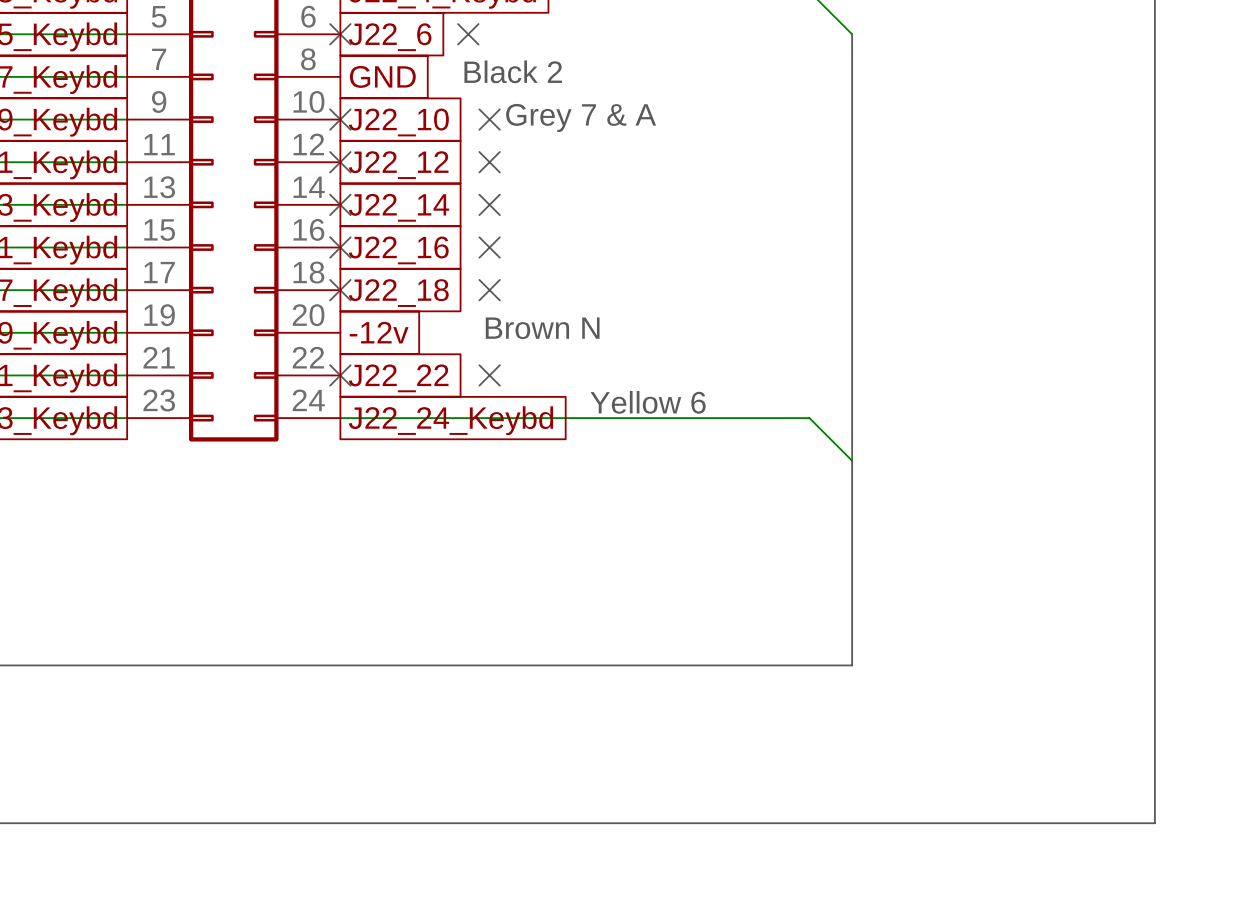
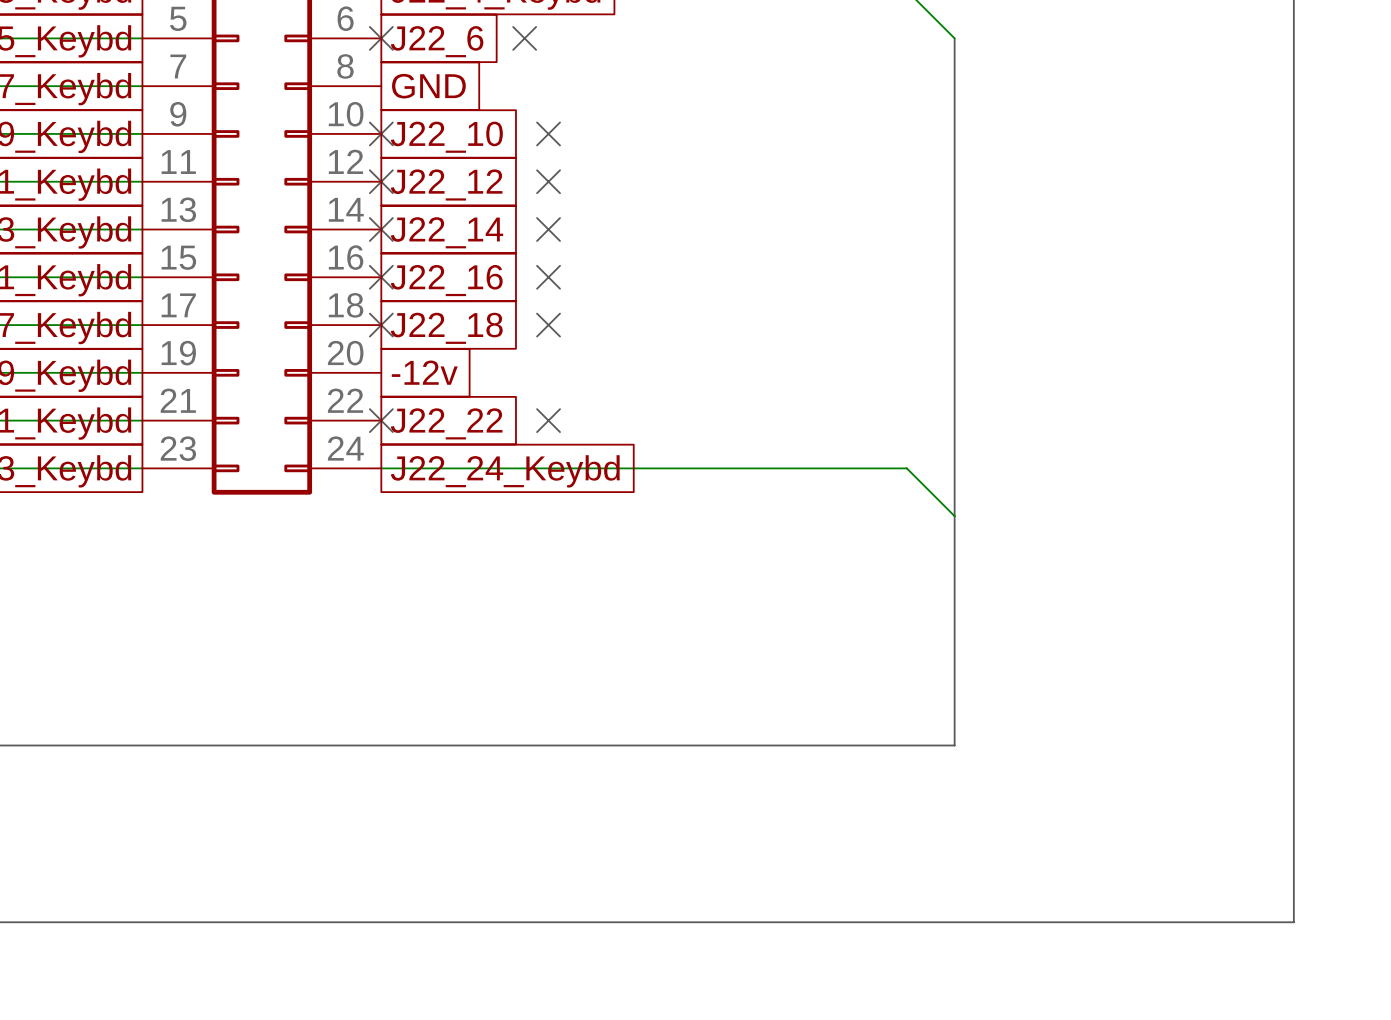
text: Black 2 (513, 71) -> none
text: Grey 7 & A (581, 117) -> none
text: Brown N (542, 328) -> none
text: Yellow 6 (648, 402) -> none

